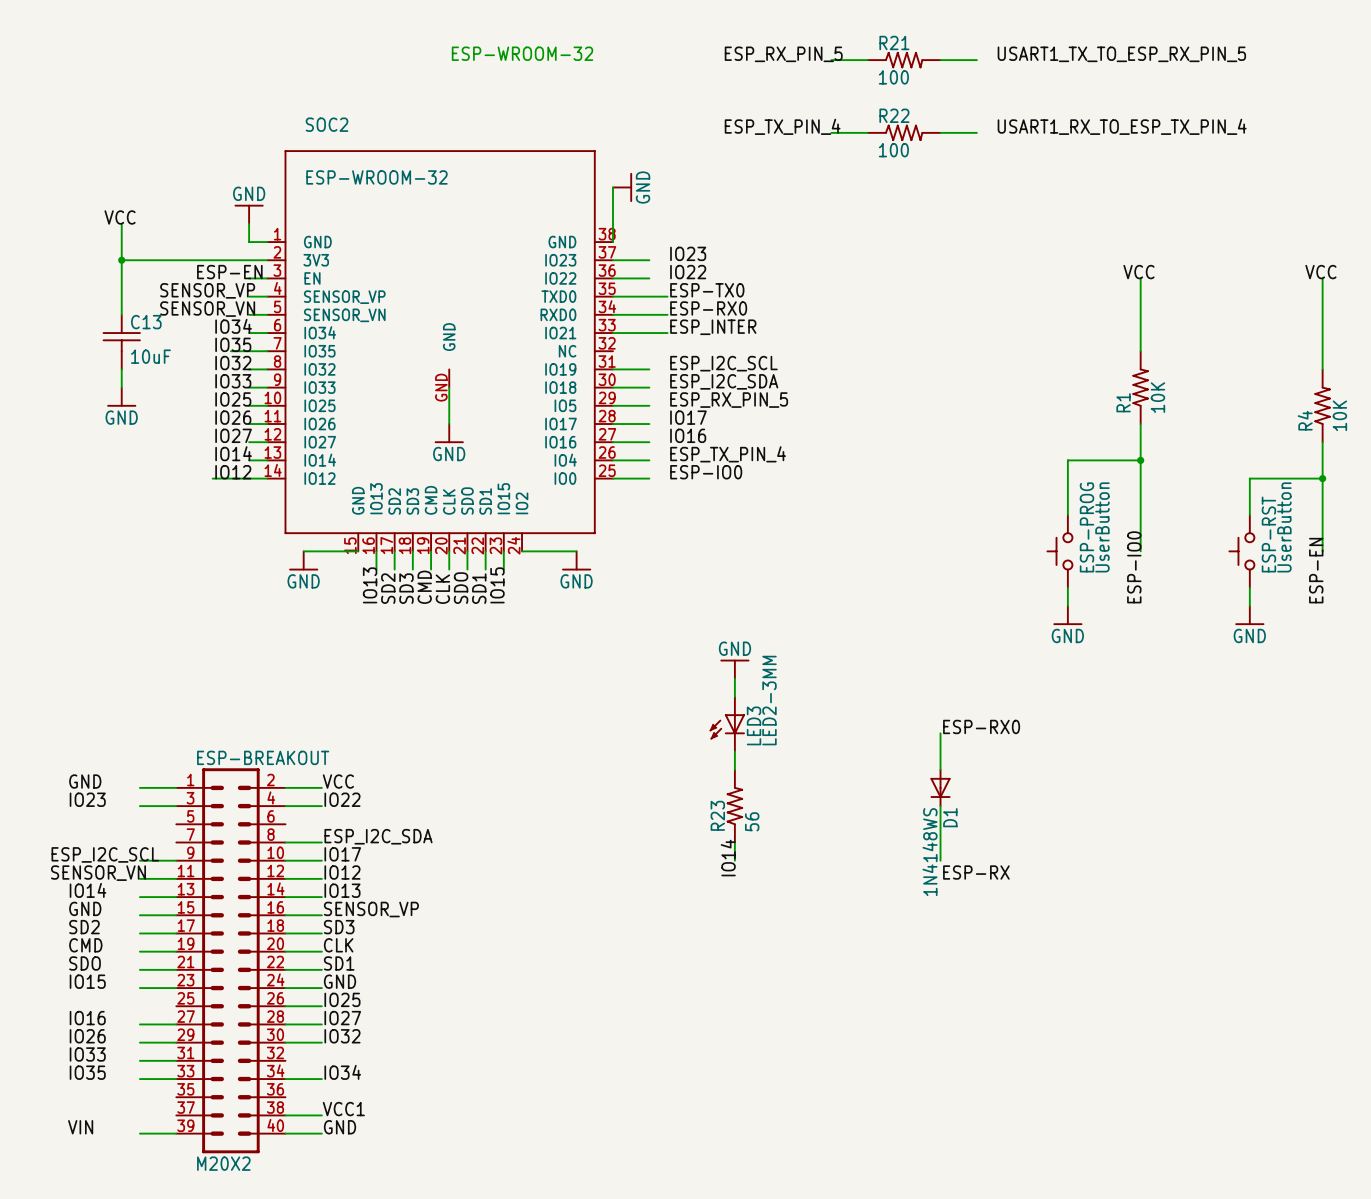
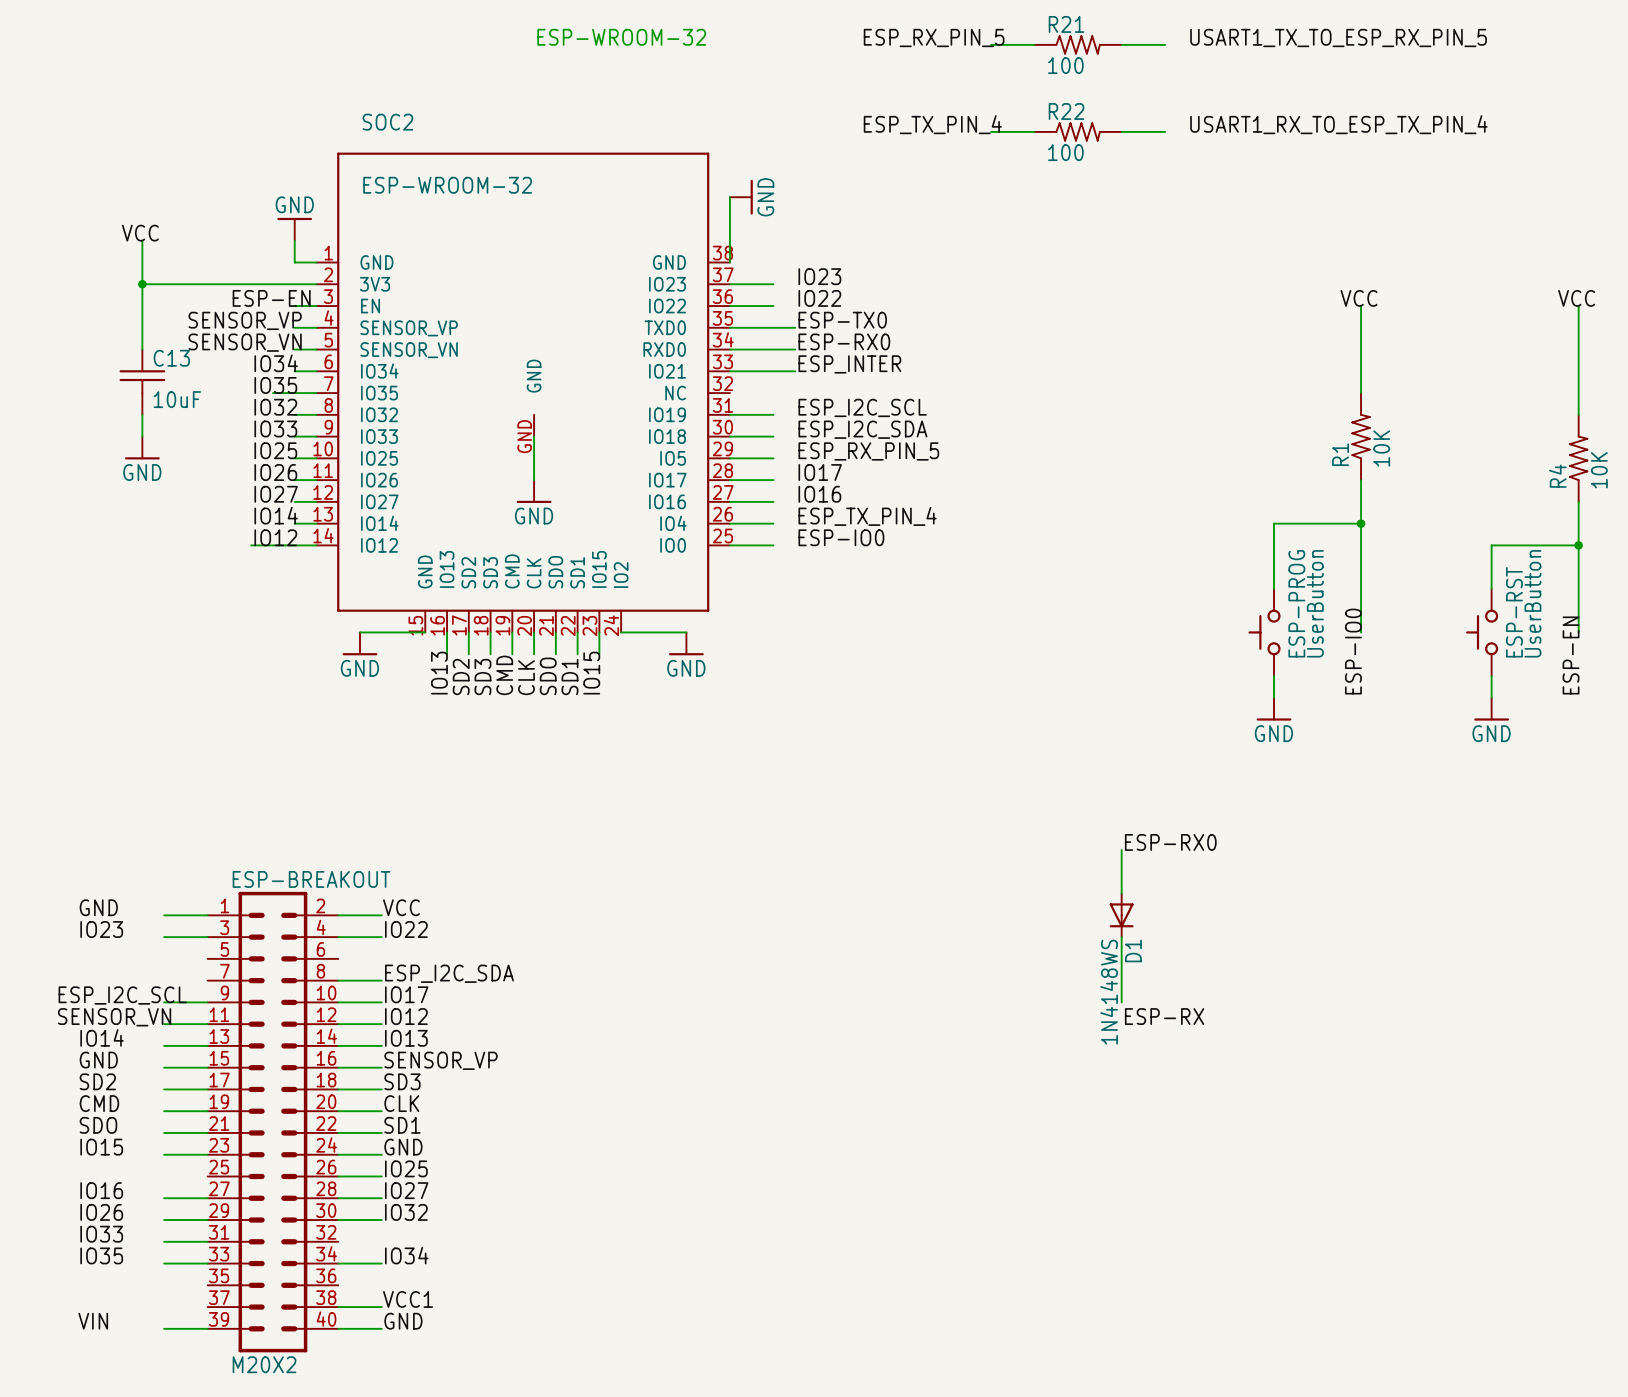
power symbol: GND (734, 669) -> none
wire: (734, 678) (734, 696) -> none
LED3: LED2-3MM (727, 724) -> none
wire: (734, 751) (734, 769) -> none
R23: 56 (734, 806) -> none
wire: (734, 842) (734, 860) -> none
label: IO14 (728, 858) -> none

